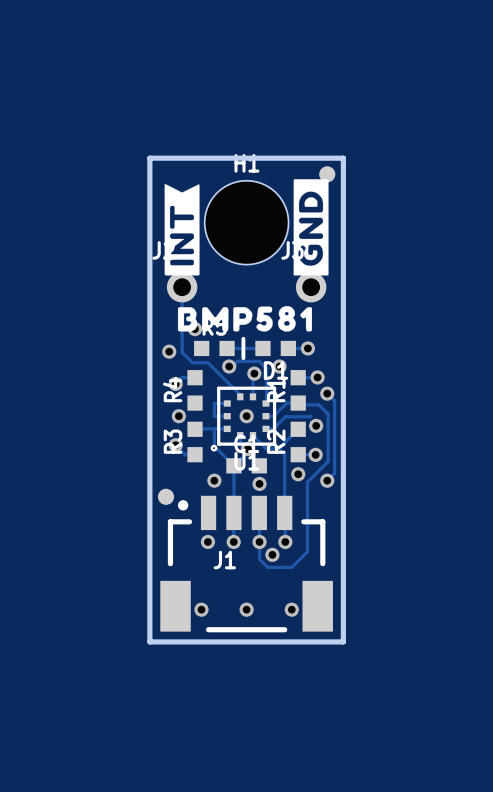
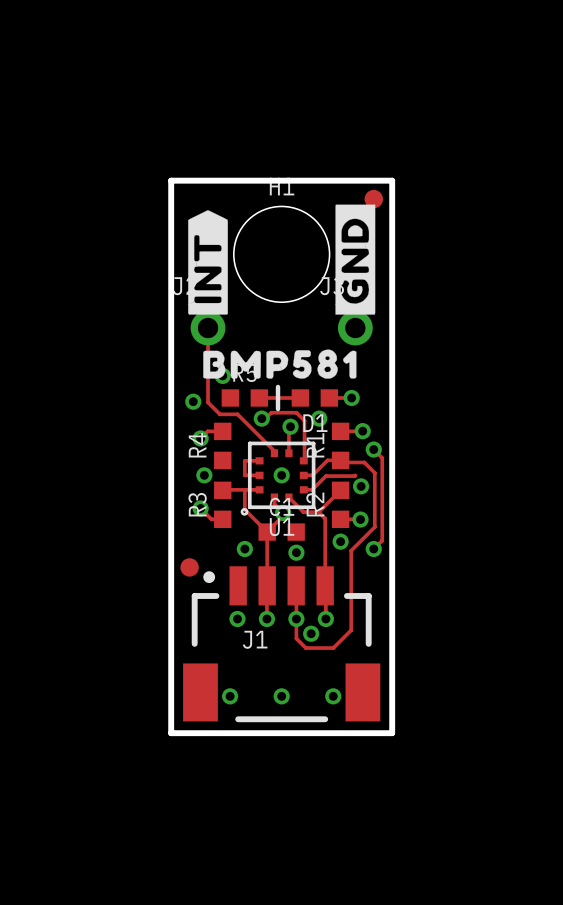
drawing shape: [164, 184, 200, 276] -> [188, 210, 228, 315]

